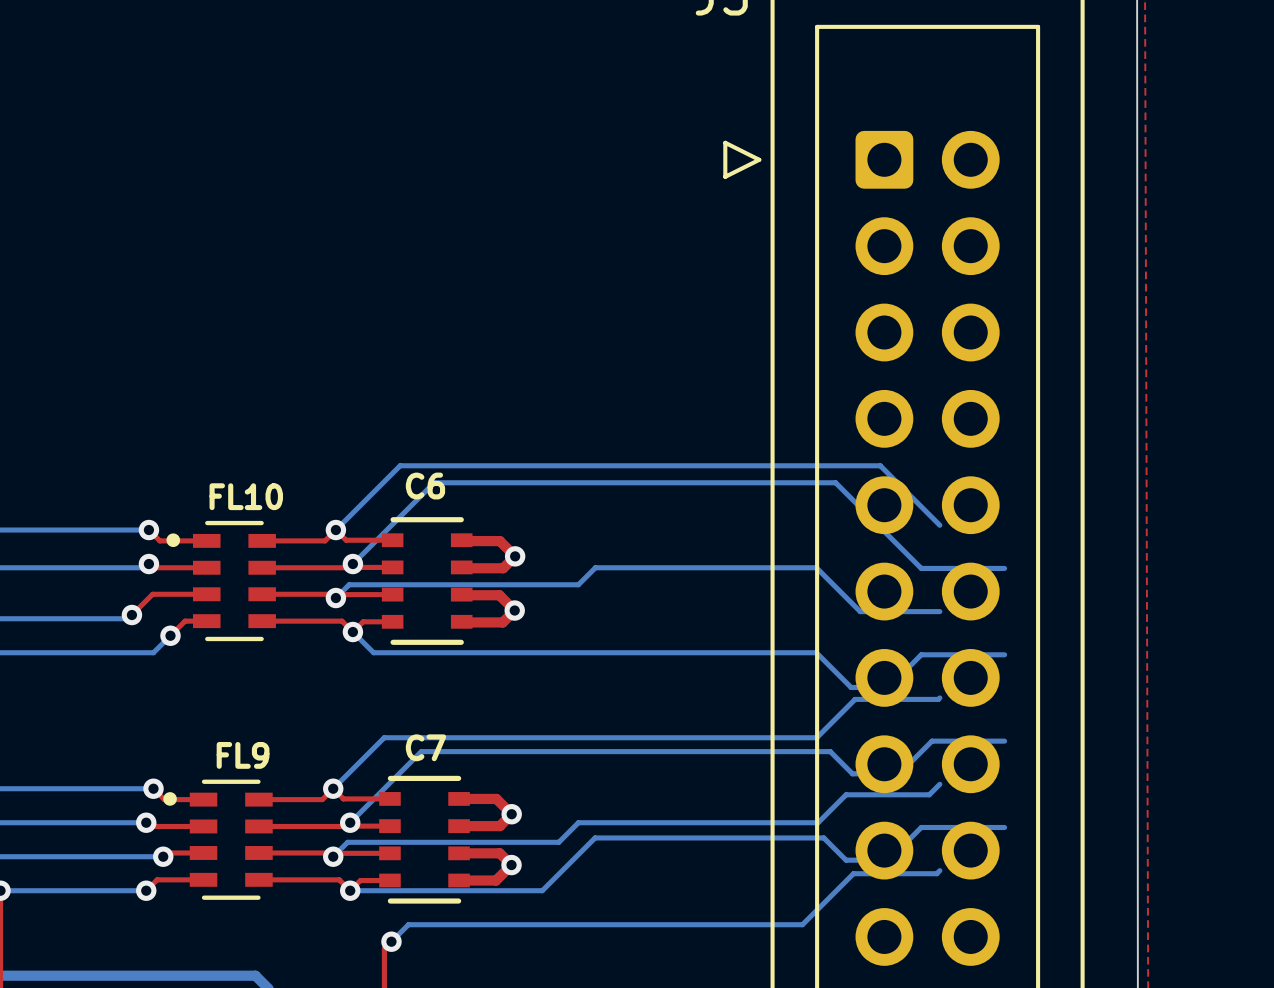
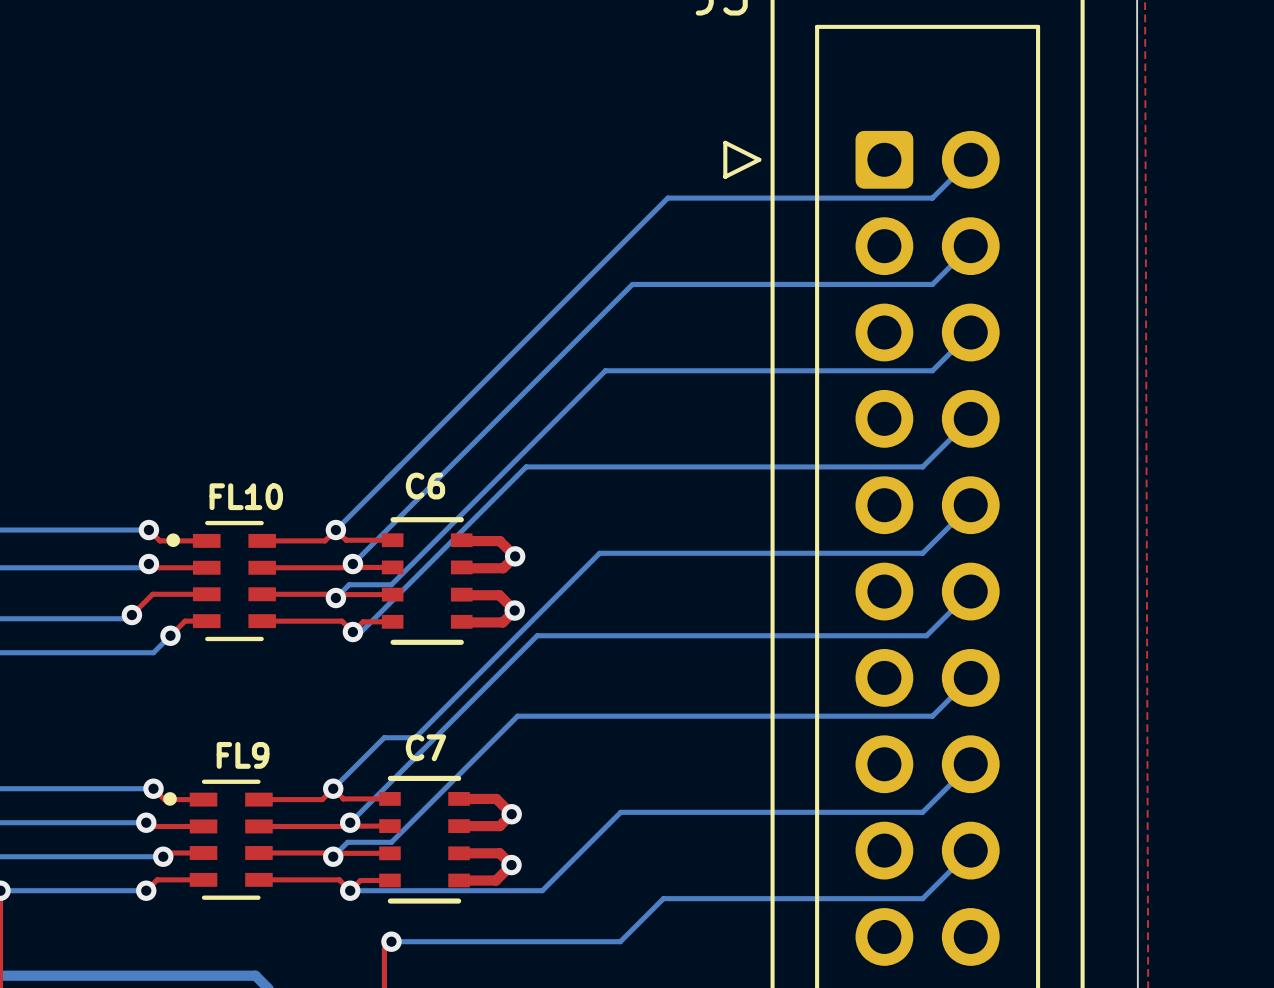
bottom track: (400, 465) (880, 465) (939, 525) -> (400, 465) (667, 198) (932, 198) (970, 159)
bottom track: (434, 482) (835, 482) (921, 568) (1004, 568) -> (434, 482) (632, 284) (932, 284) (970, 246)
bottom track: (391, 584) (578, 584) (595, 567) (816, 567) (860, 611) (939, 611) -> (391, 584) (605, 370) (932, 370) (970, 332)
bottom track: (352, 632) (373, 652) (816, 652) (851, 687) (888, 687) (921, 654) (1004, 654) -> (352, 632) (361, 632) (526, 466) (922, 466) (970, 418)
bottom track: (939, 697) (855, 699) (816, 737) (415, 737) -> (970, 505) (922, 553) (599, 553) (415, 737)
bottom track: (1004, 741) (932, 741) (899, 773) (852, 773) (830, 751) (421, 751) -> (970, 591) (926, 635) (537, 635) (421, 751)
bottom track: (939, 784) (929, 794) (846, 794) (818, 822) (578, 822) (558, 842) (391, 842) -> (970, 677) (932, 716) (517, 716) (391, 842)
bottom track: (1004, 827) (921, 827) (888, 860) (846, 860) (823, 837) (595, 837) -> (970, 764) (922, 812) (620, 812) (595, 837)
bottom track: (939, 870) (936, 873) (853, 873) (802, 924) (408, 924) (391, 941) -> (970, 850) (922, 898) (663, 898) (620, 941) (391, 941)

